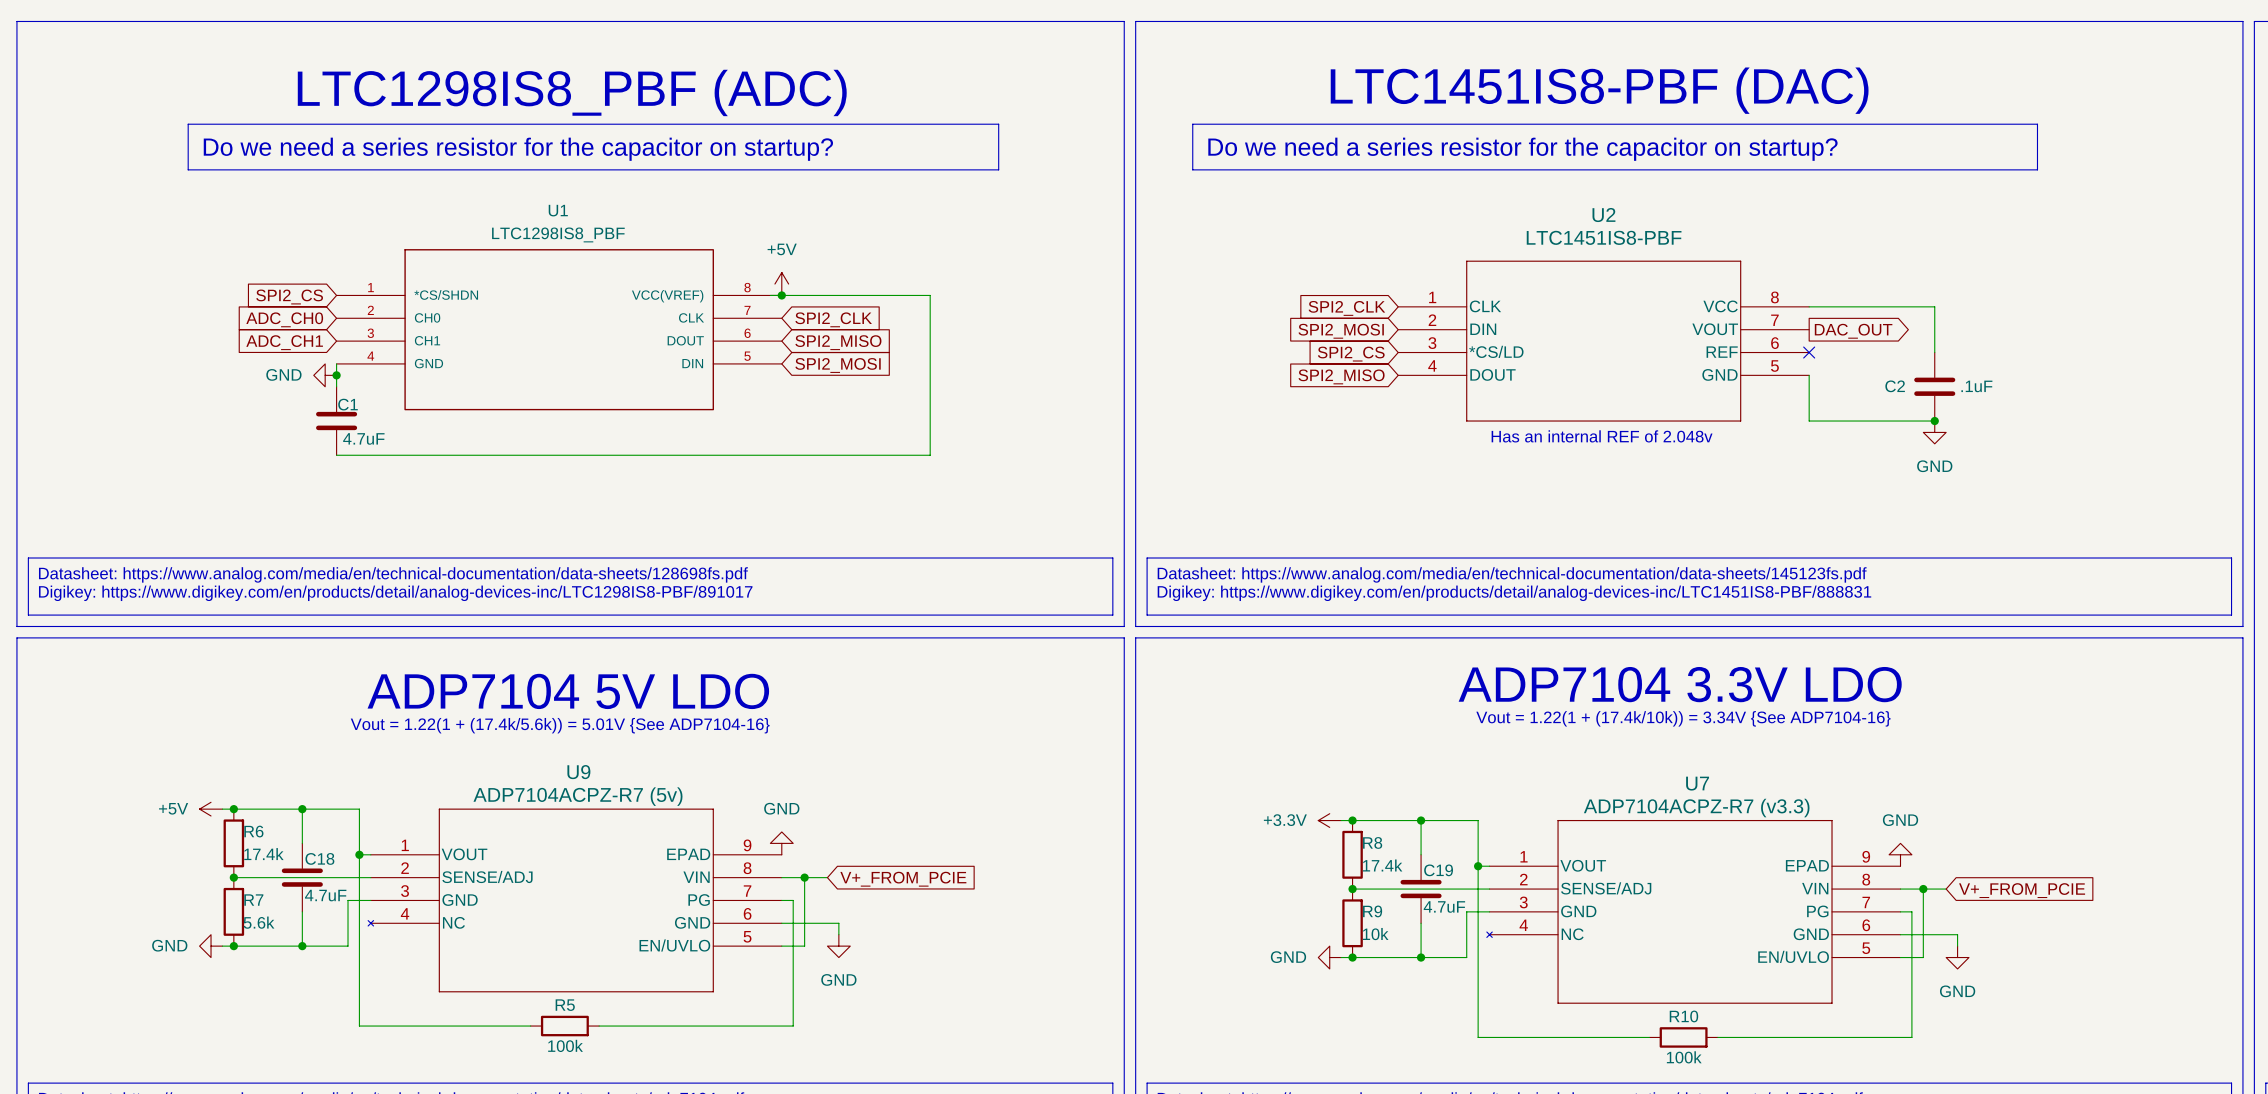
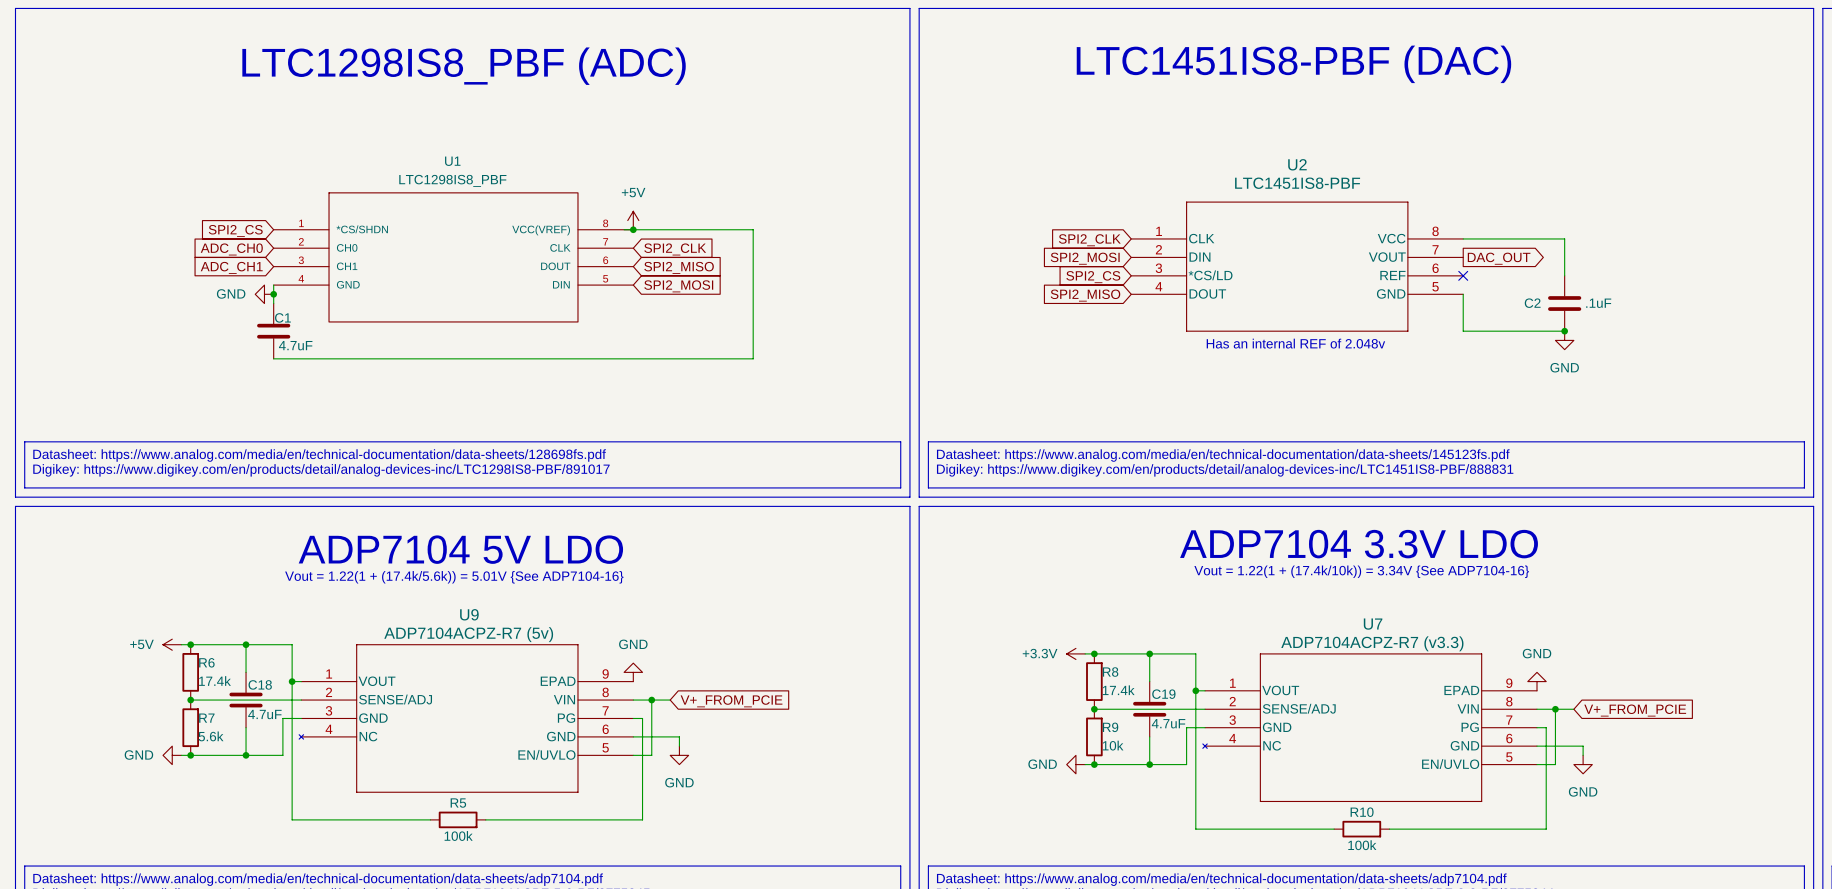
line: (188, 124) (998, 124) (998, 169) (188, 169) (188, 124) -> none
line: (1192, 124) (2037, 124) (2037, 169) (1192, 169) (1192, 124) -> none
text: Do we need a series resistor for the capacitor on startup? (518, 149) -> none
text: Do we need a series resistor for the capacitor on startup? (1522, 149) -> none

